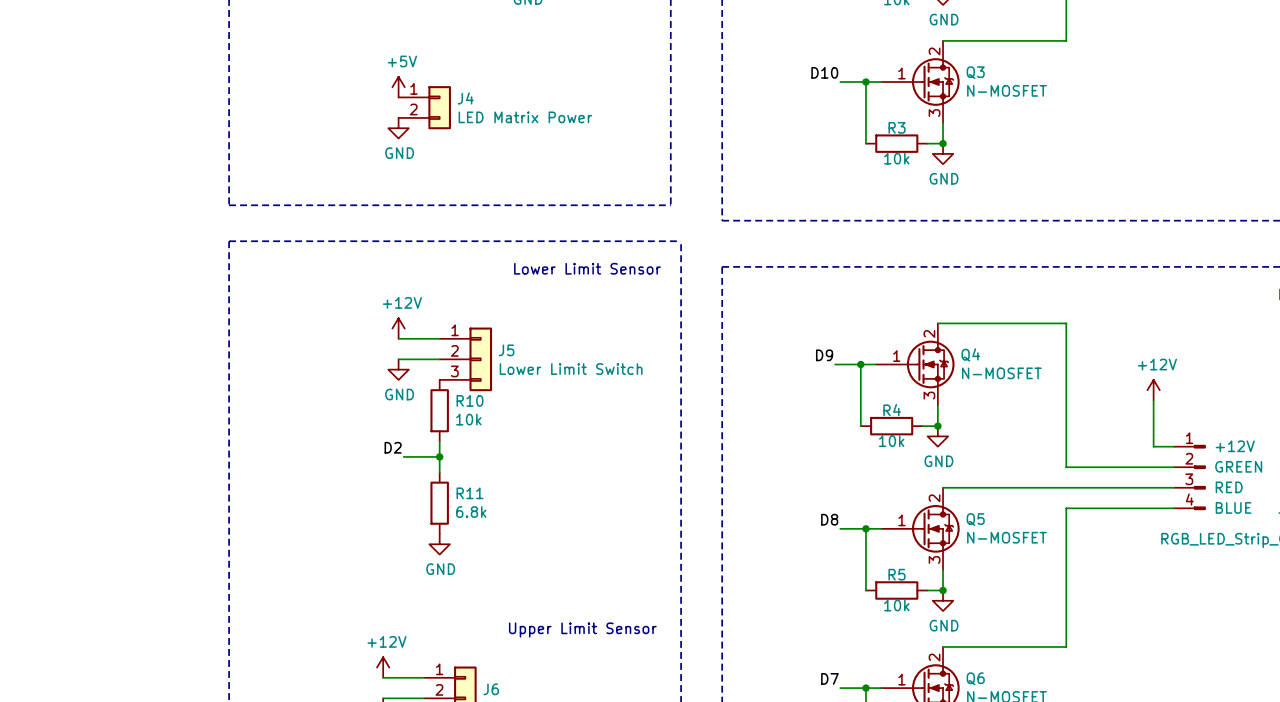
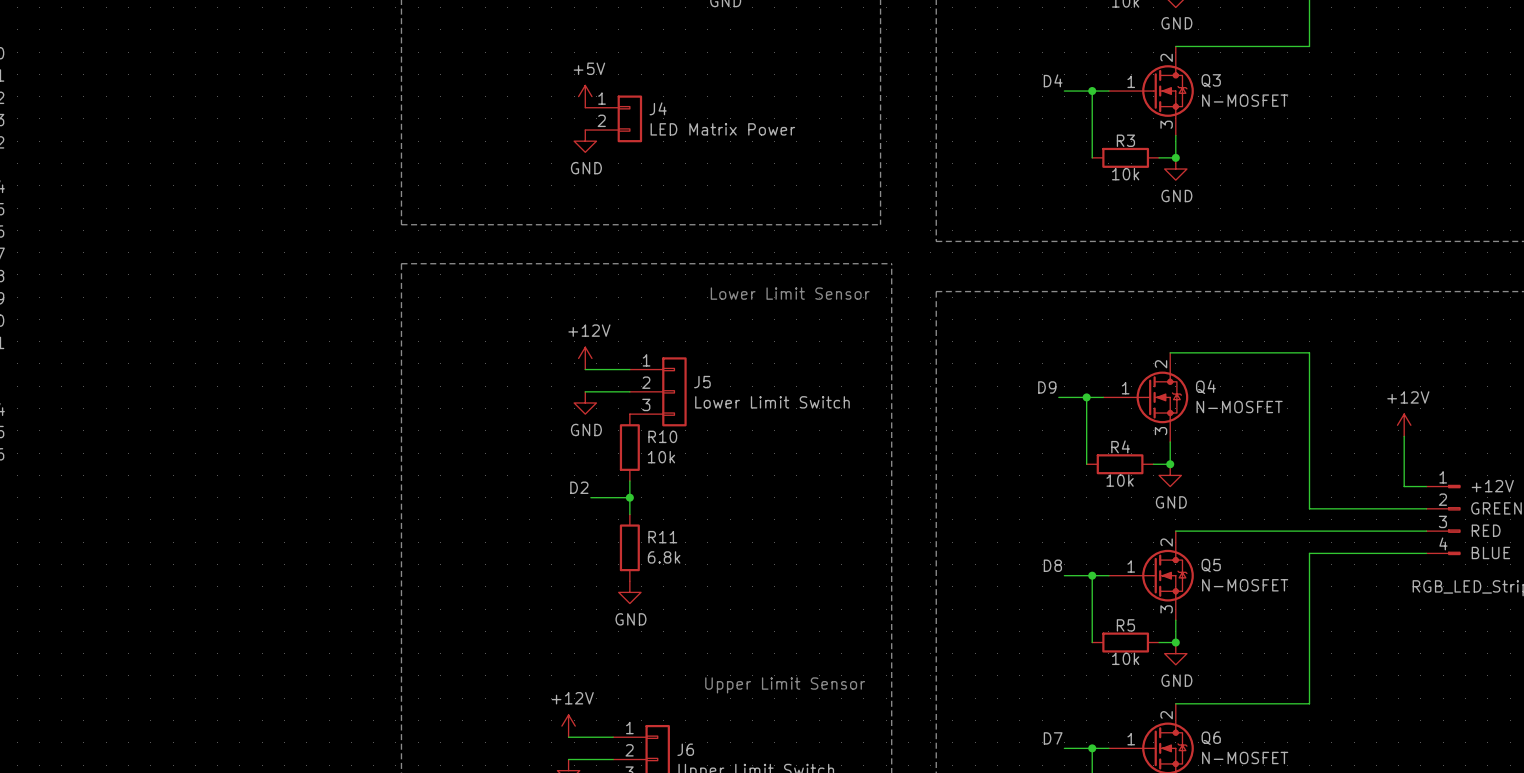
label: D10 (824, 72) -> D4 (1053, 80)

